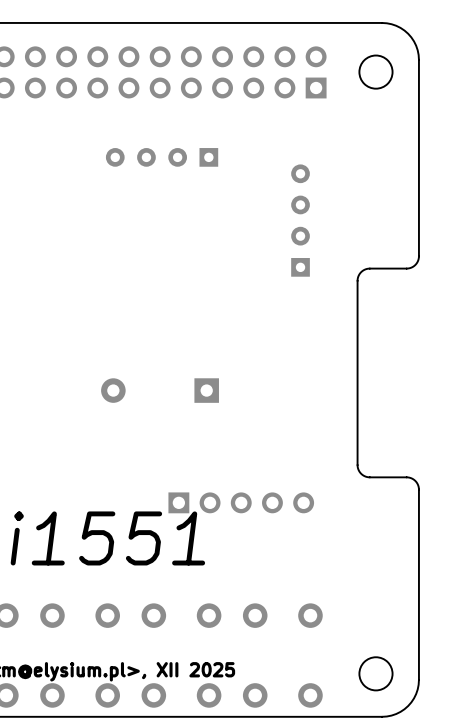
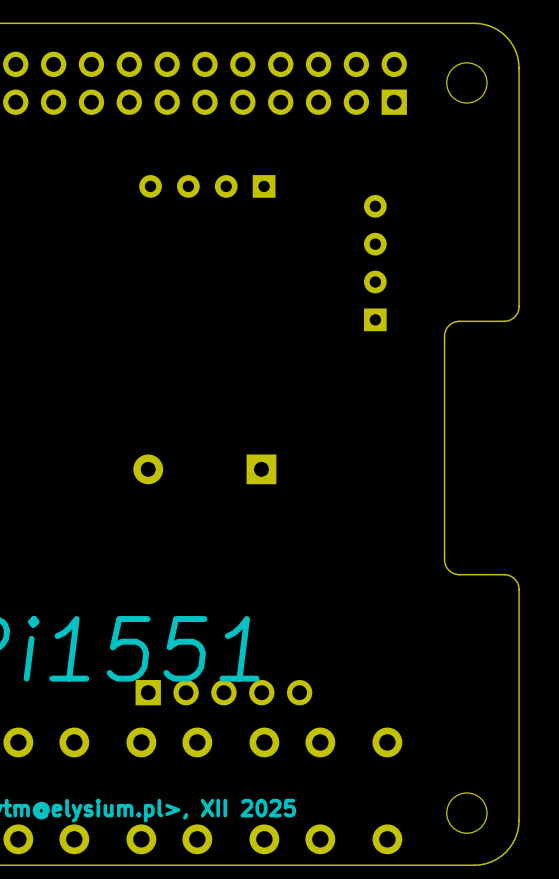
part position: (241, 502) -> (223, 692)

